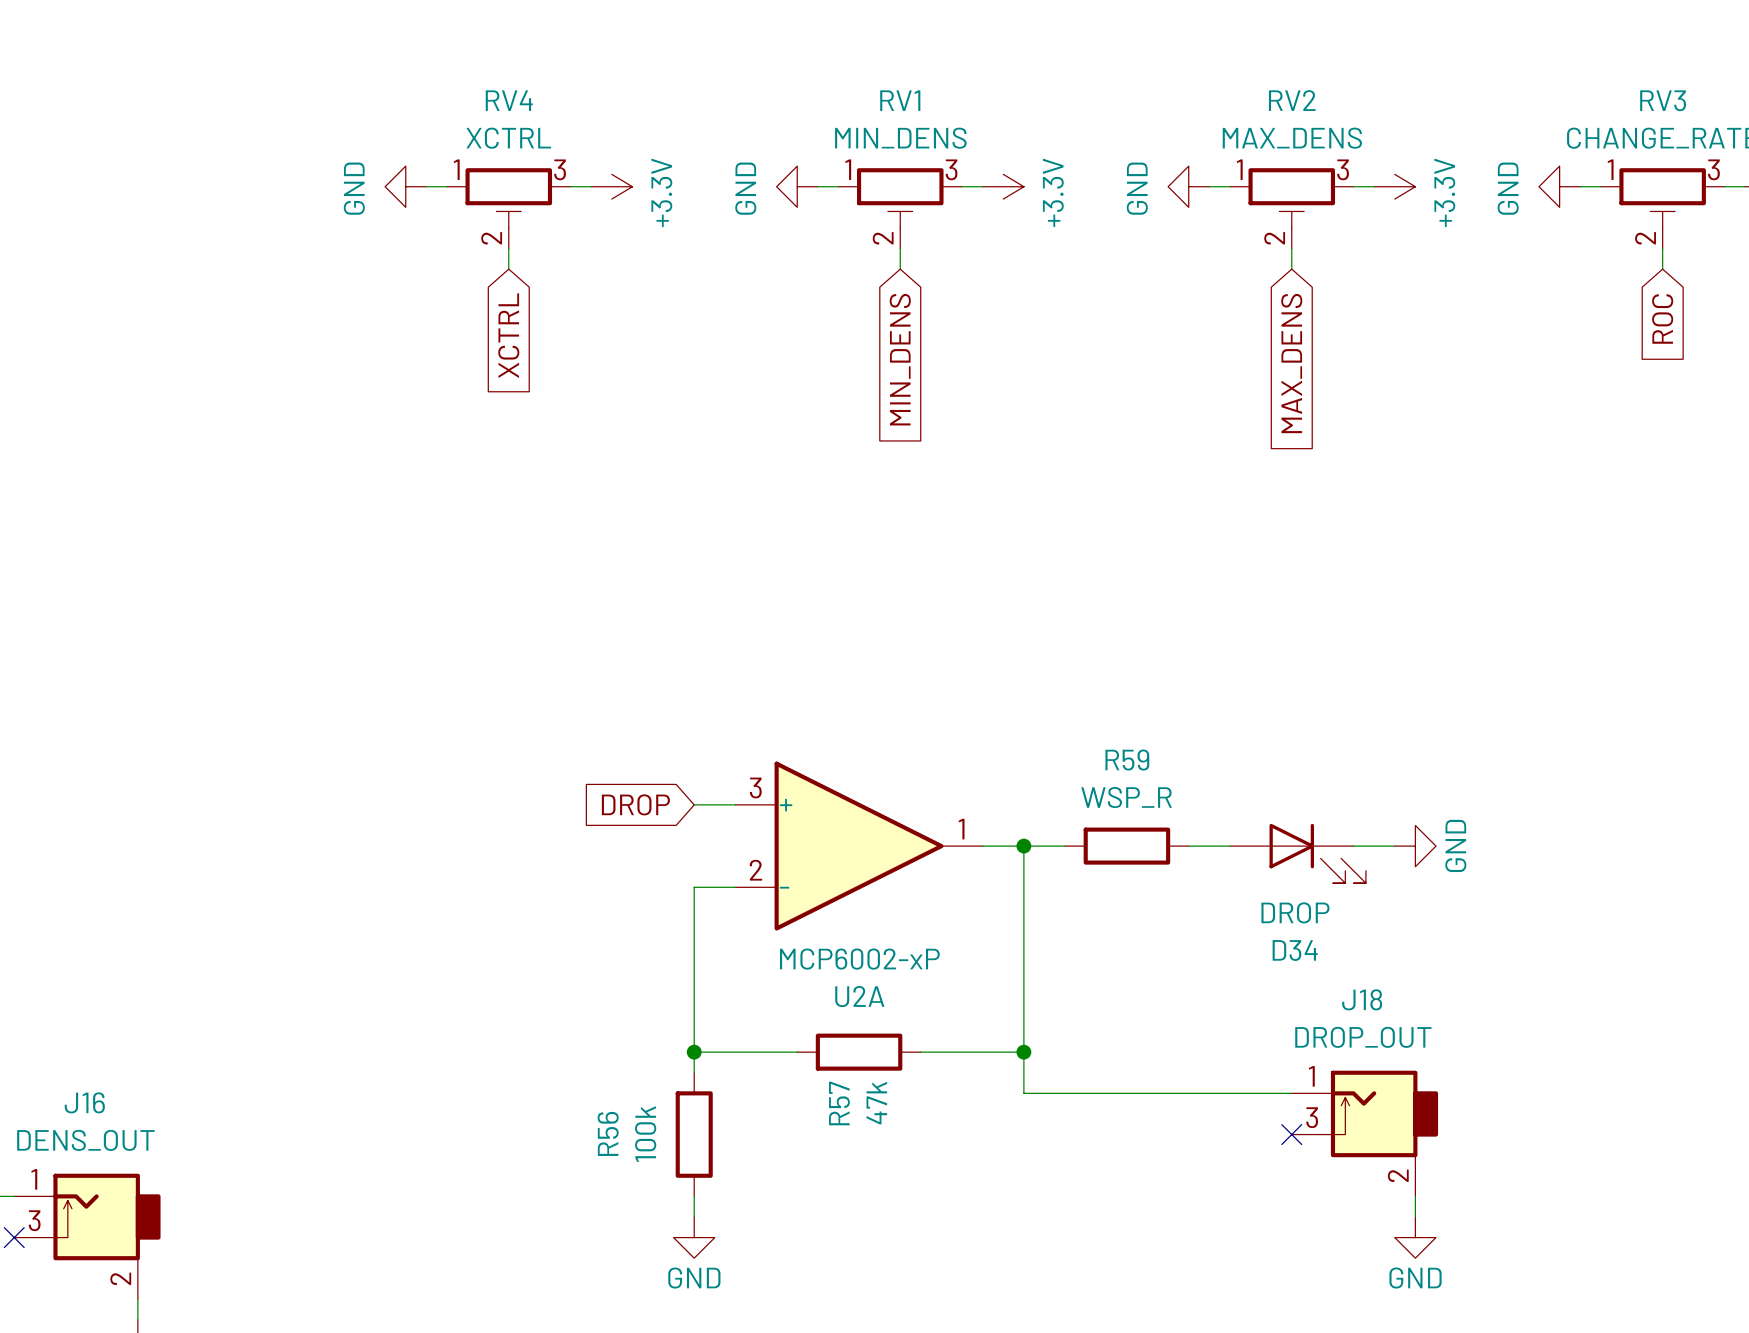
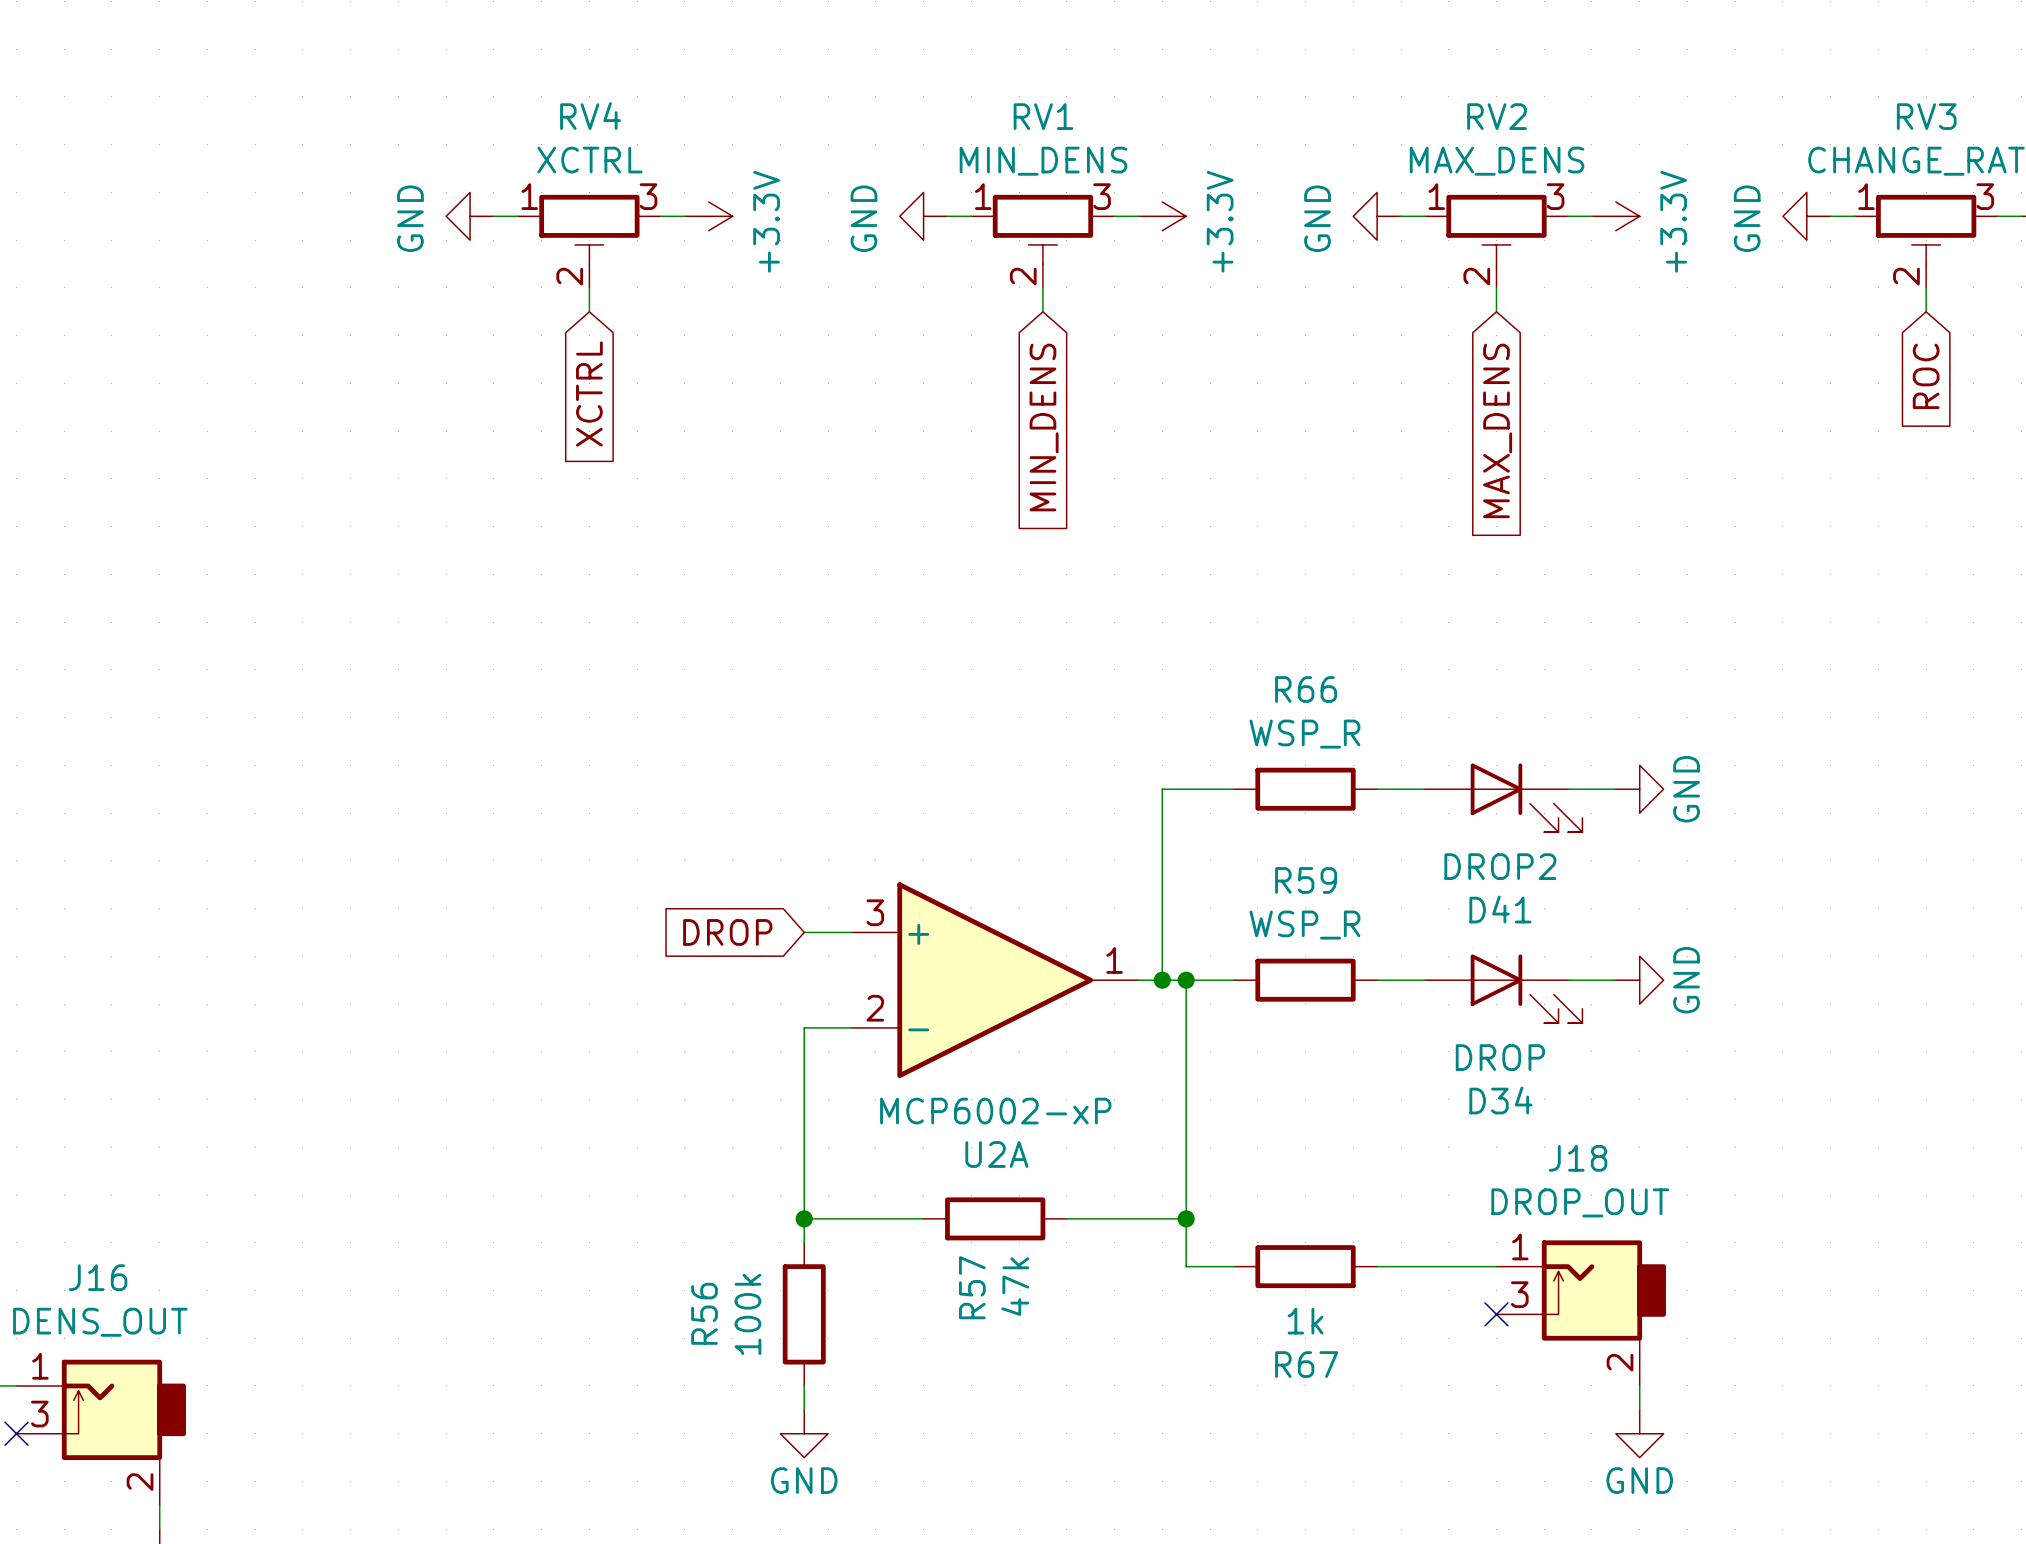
wire: none -> (1233, 789) (1162, 789) (1162, 980)
R66: none -> WSP_R (1305, 789)
wire: none -> (1377, 789) (1424, 789)
wire: none -> (1568, 789) (1615, 789)
power symbol: none -> GND (1639, 789)
D41: none -> DROP2 (1503, 797)
junction: none -> (1162, 980)
wire: (1065, 1093) (1188, 1093) -> none
R67: none -> 1k (1305, 1266)

